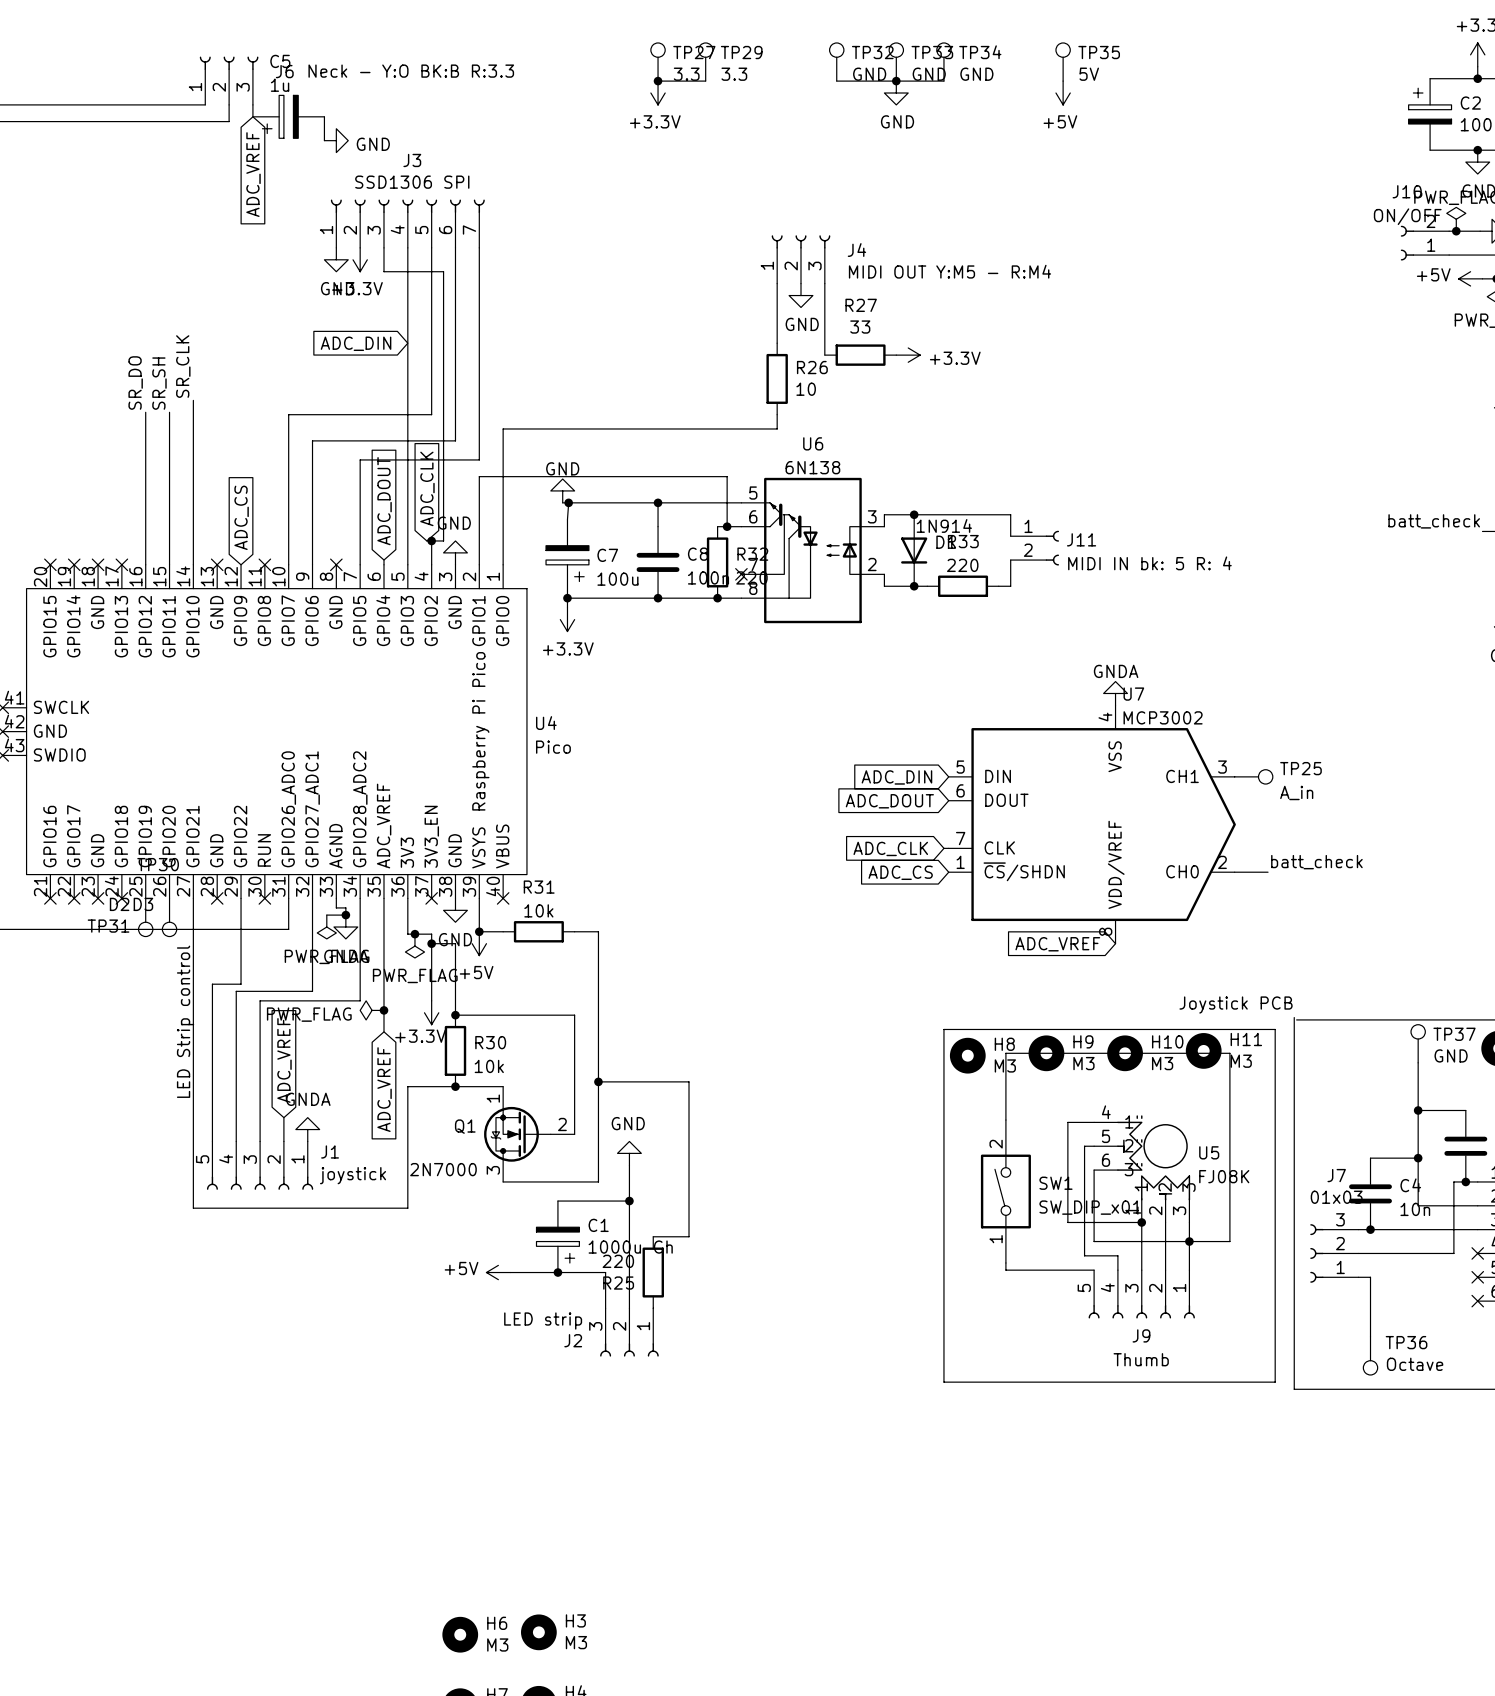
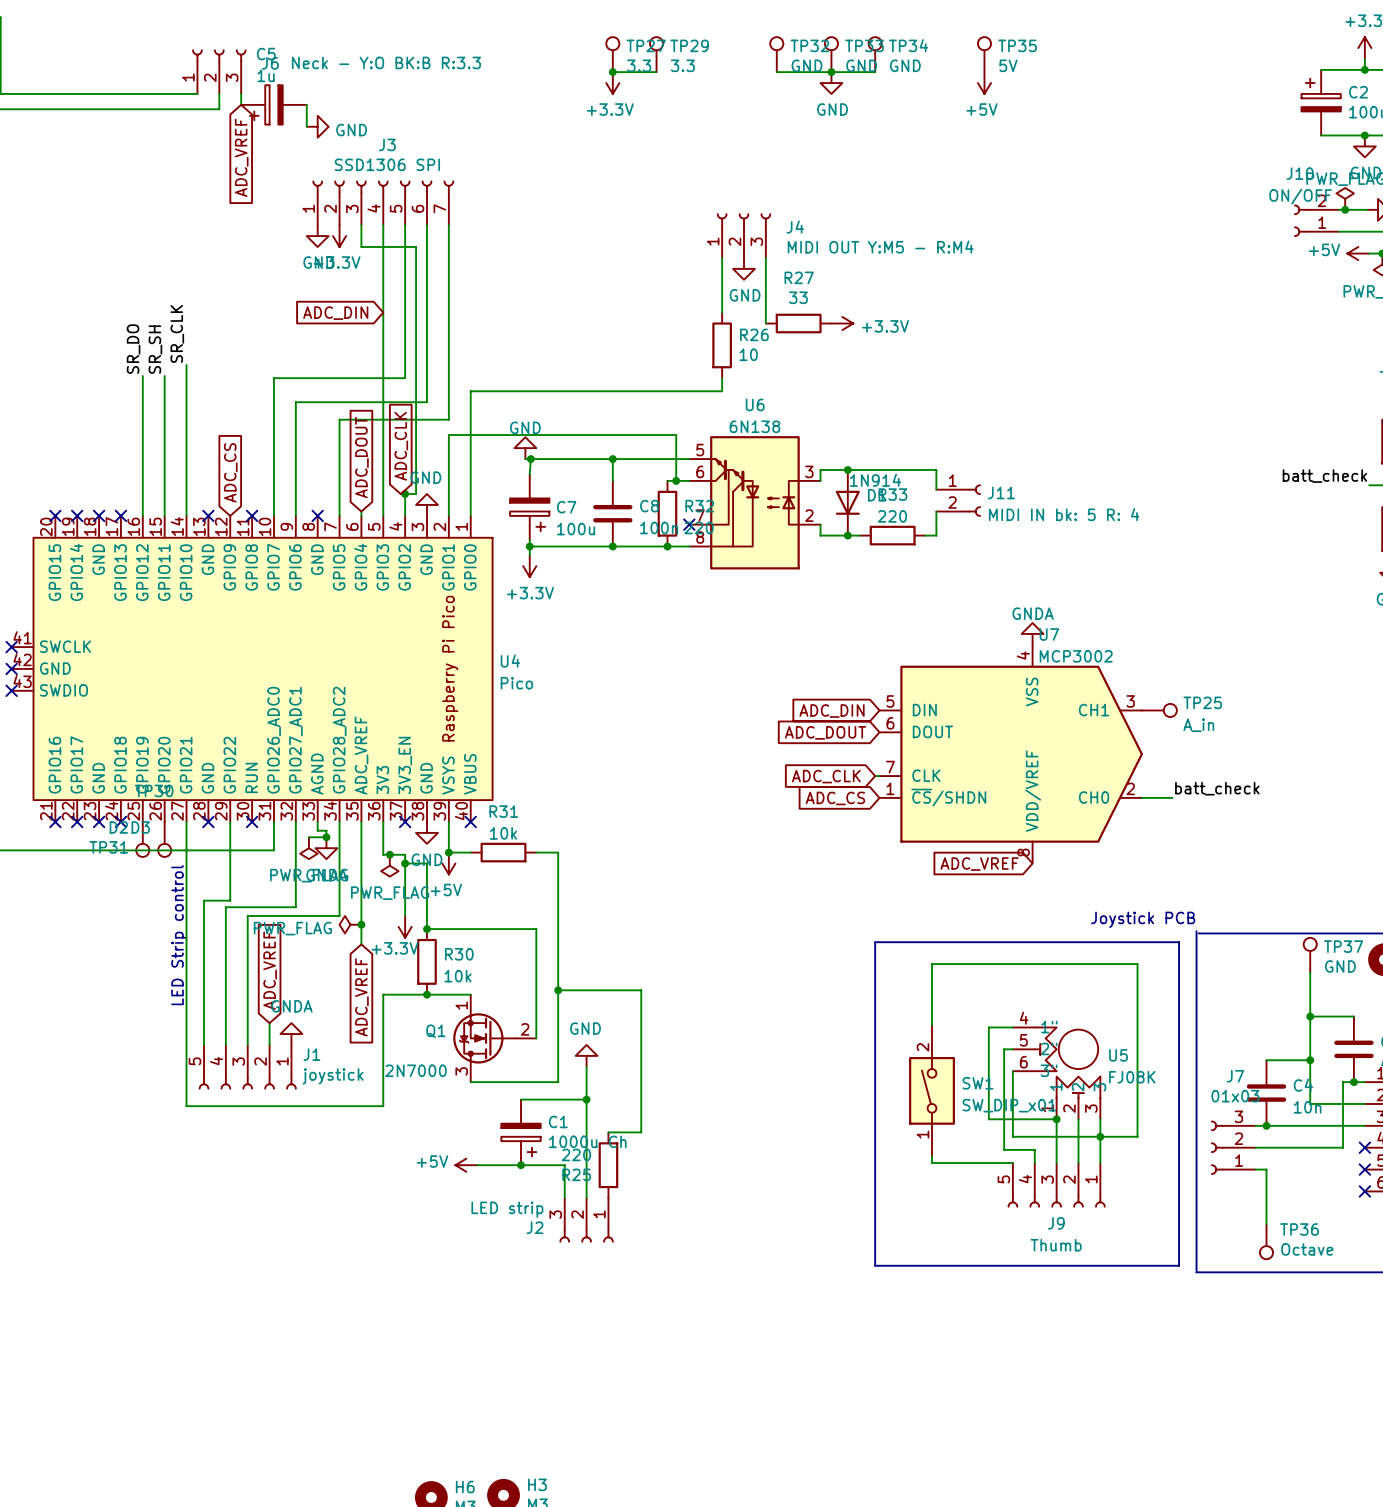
H11: M3 (1203, 1050) -> none
H9: M3 (1046, 1053) -> none
H10: M3 (1125, 1053) -> none
H8: M3 (967, 1055) -> none

